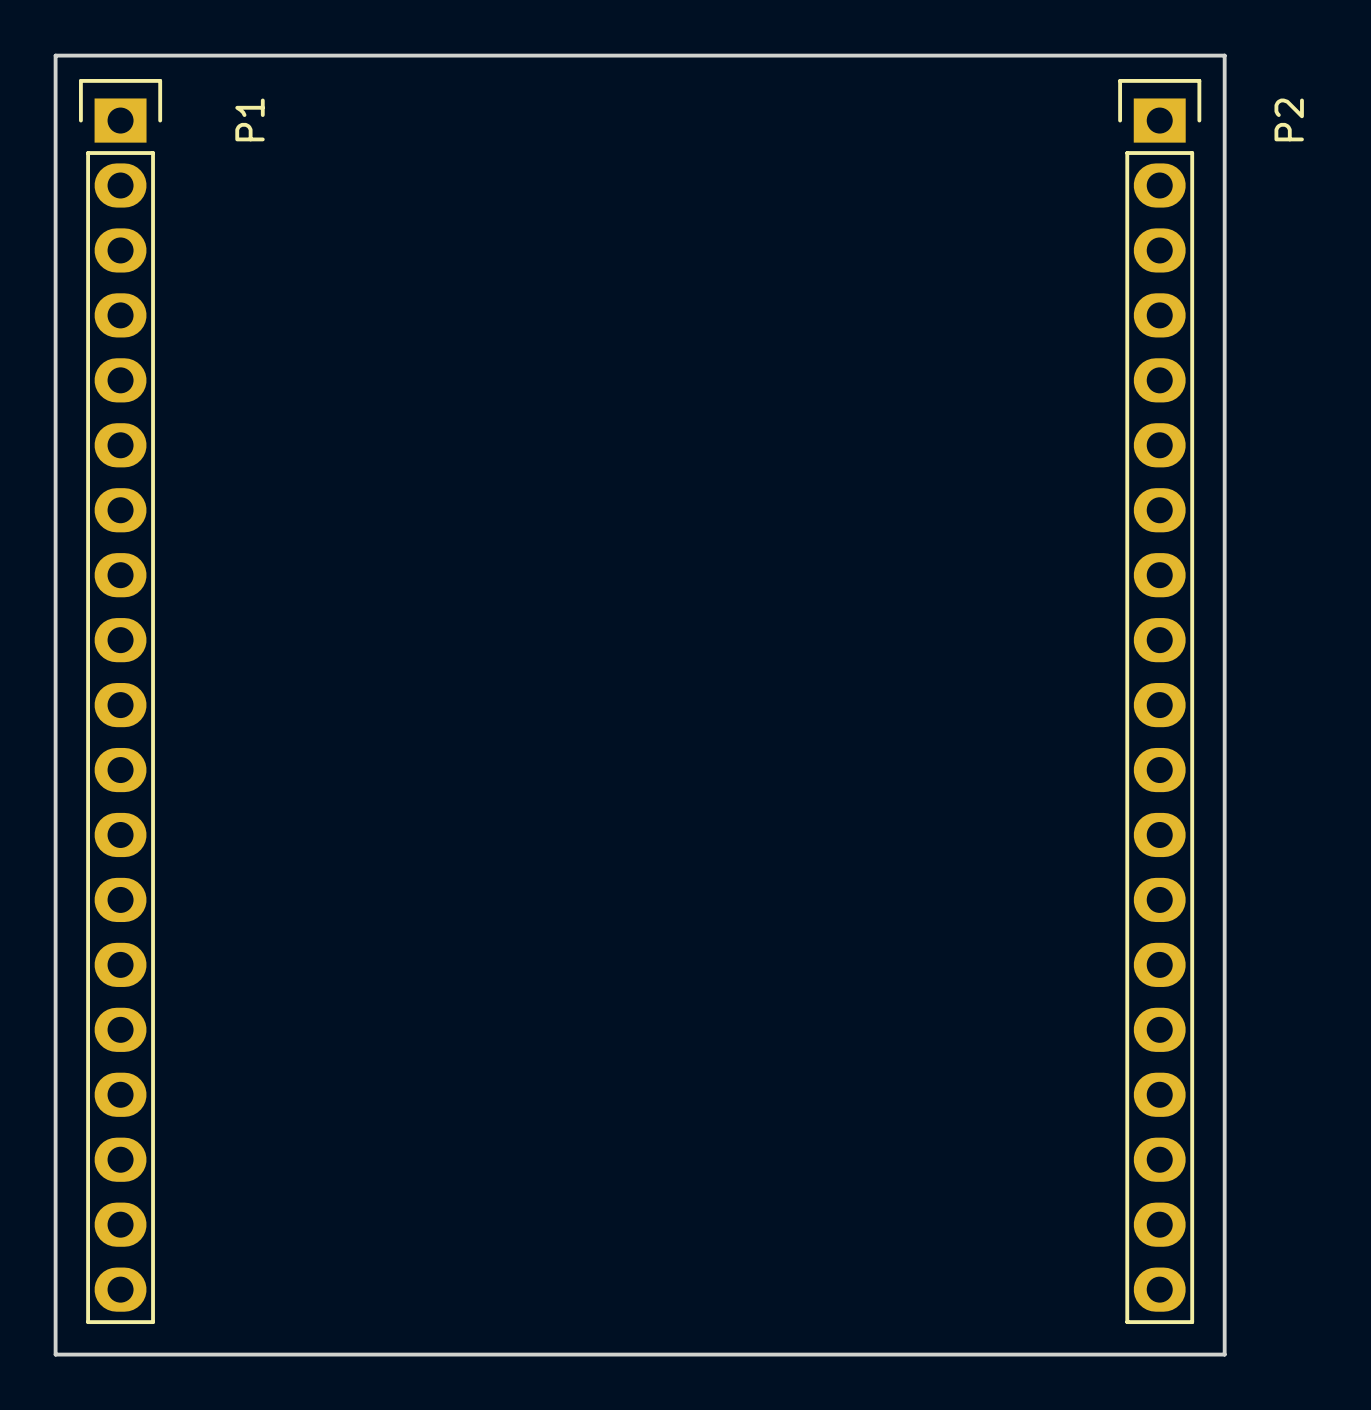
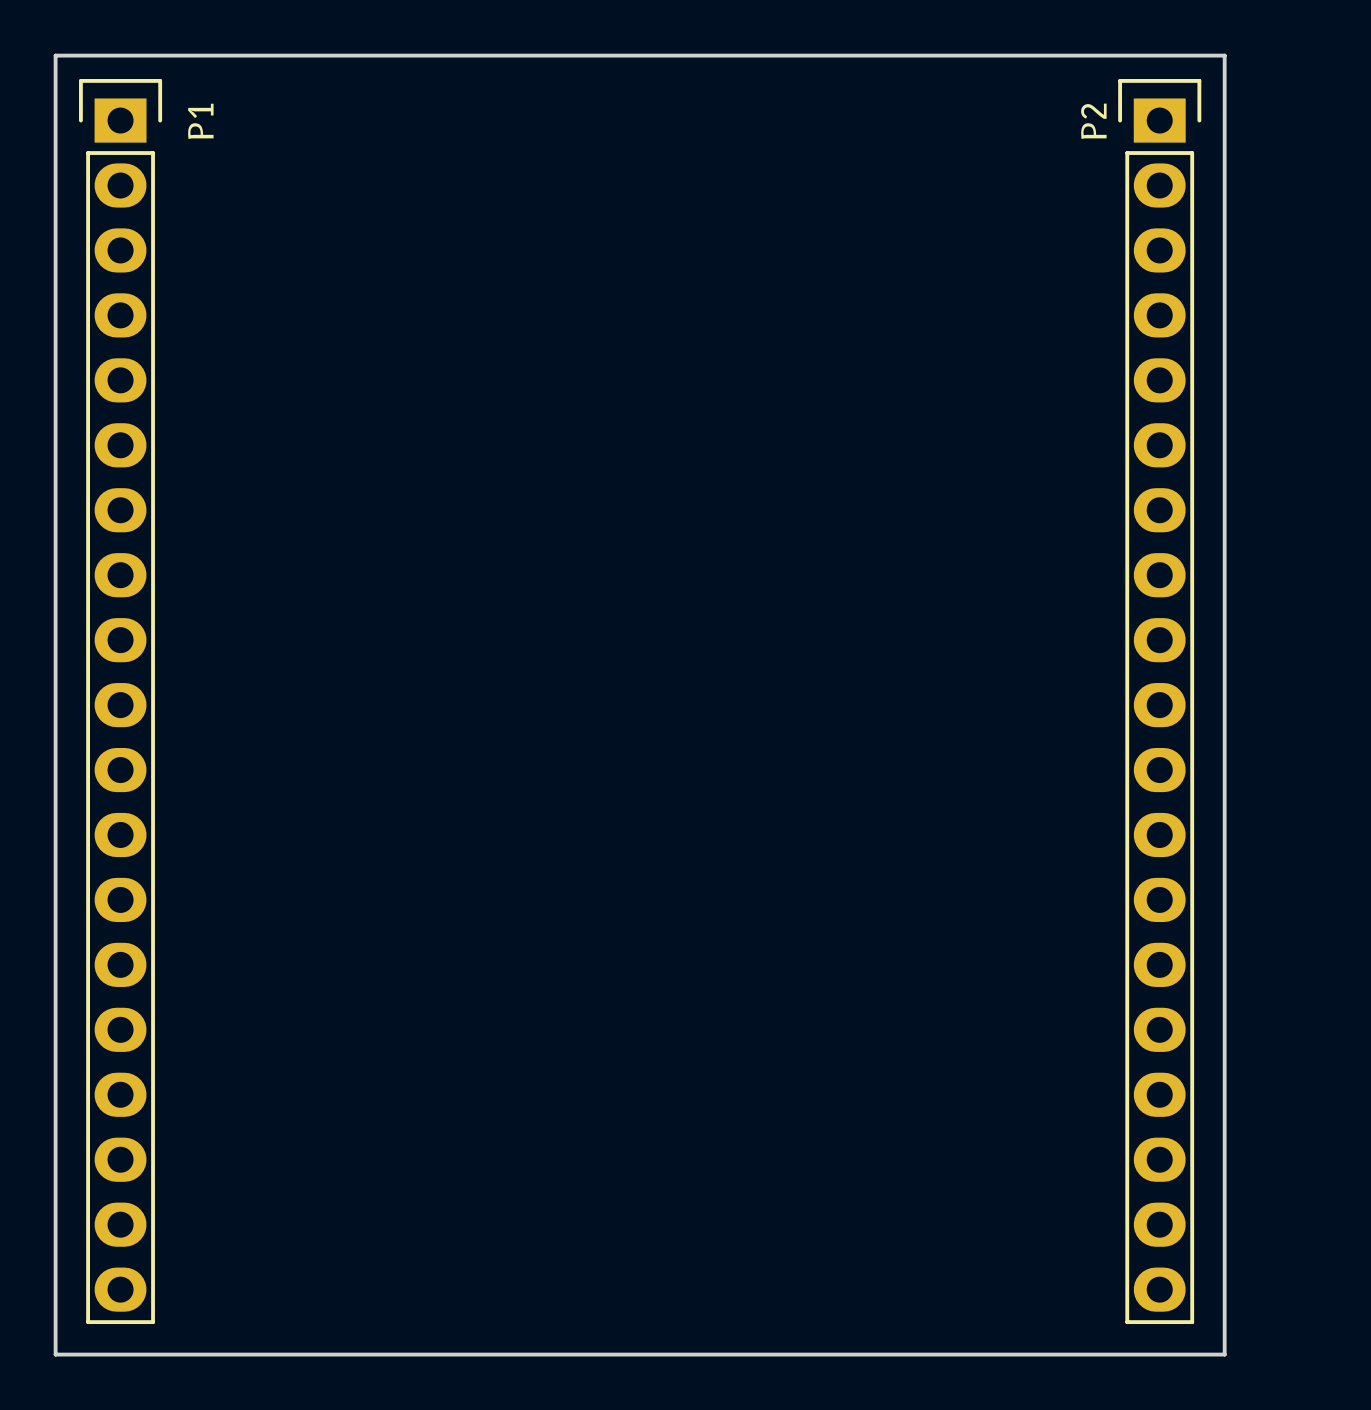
P1 name position: P1 (250, 119) -> P1 (200, 121)
P2 name position: P2 (1289, 119) -> P2 (1093, 121)

